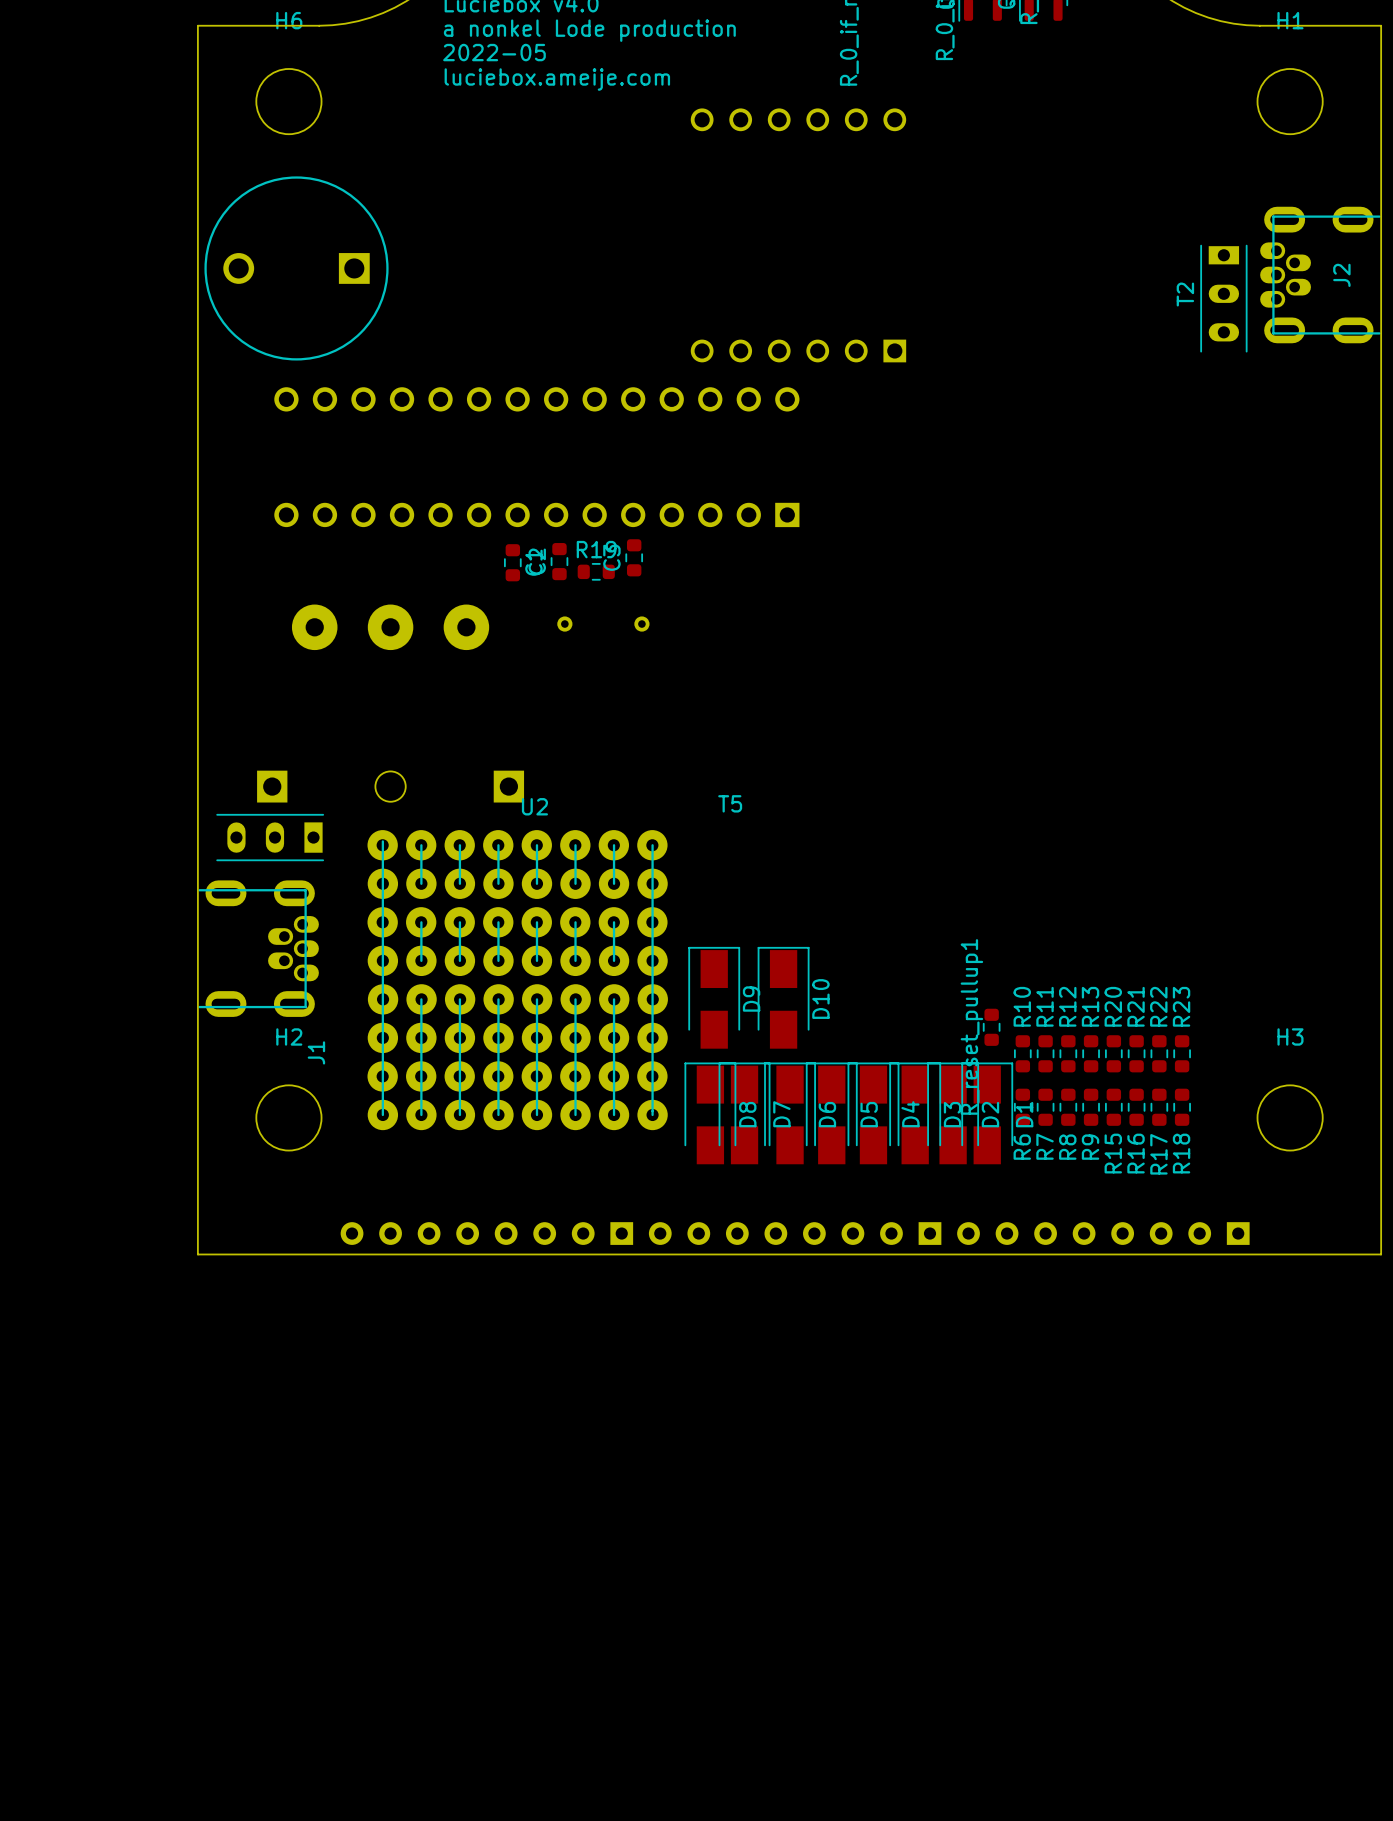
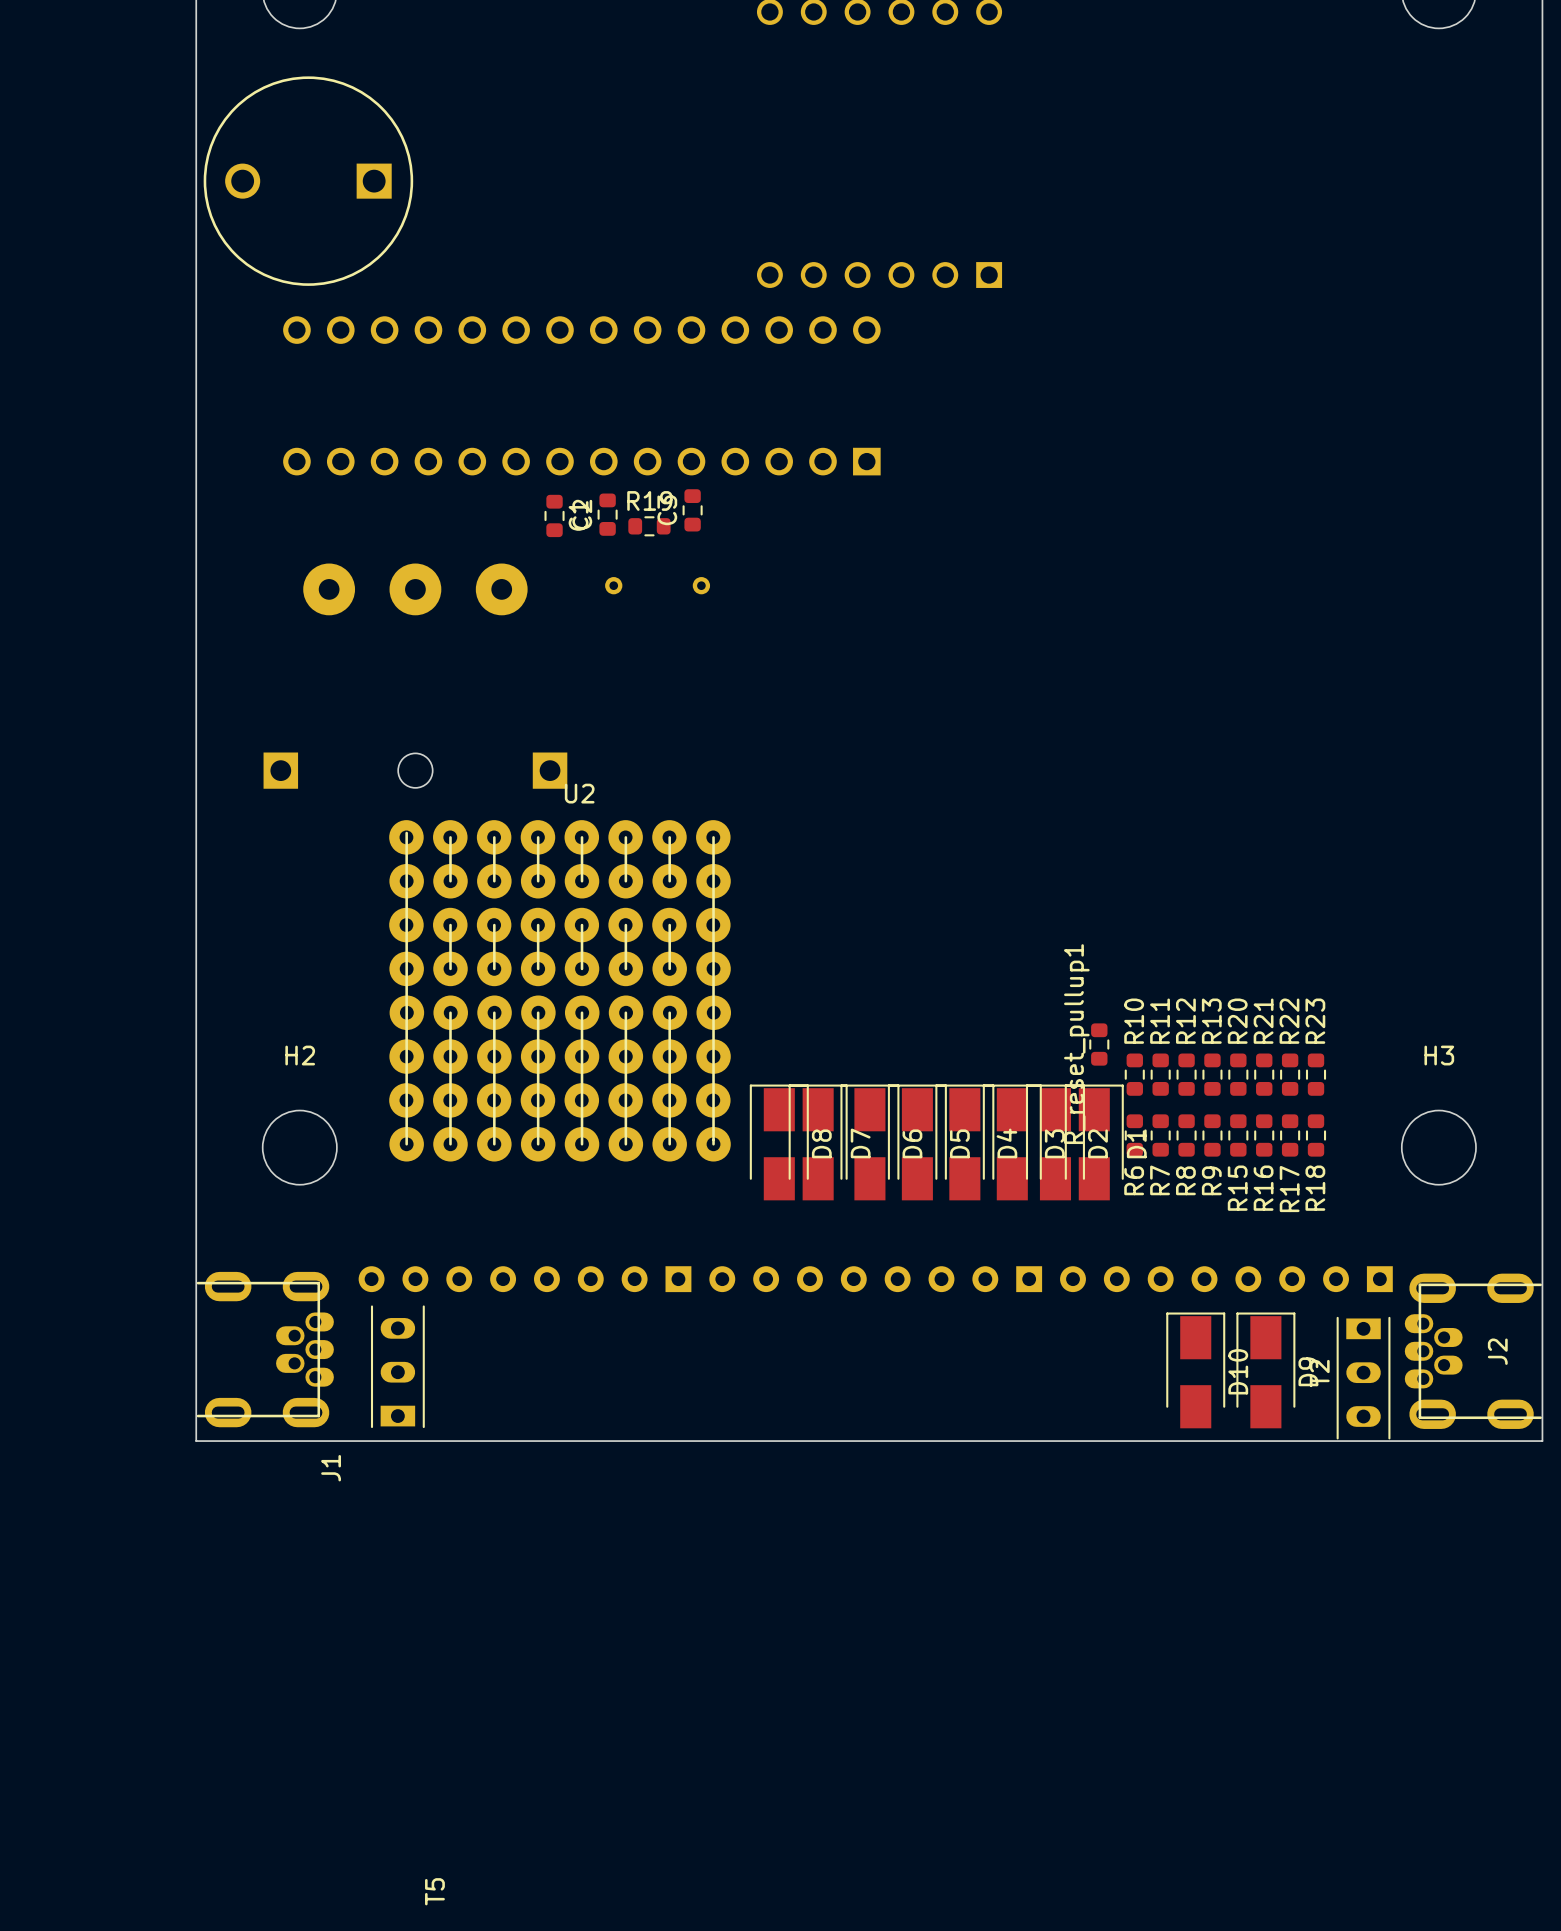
J2 position: (1320, 275) -> (1473, 1351)
T2 position: (1223, 298) -> (1363, 1378)
T5 rotation: 0° (270, 837) -> 90° clockwise (397, 1366)
T5 position: (270, 837) -> (397, 1366)
J1 position: (258, 948) -> (265, 1349)
D9 position: (714, 997) -> (1265, 1370)
D10 position: (783, 997) -> (1195, 1370)
board edge: (197, 1254) (1381, 1254) -> (196, 1302) (196, 1441) (1542, 1441) (1542, 1302)

